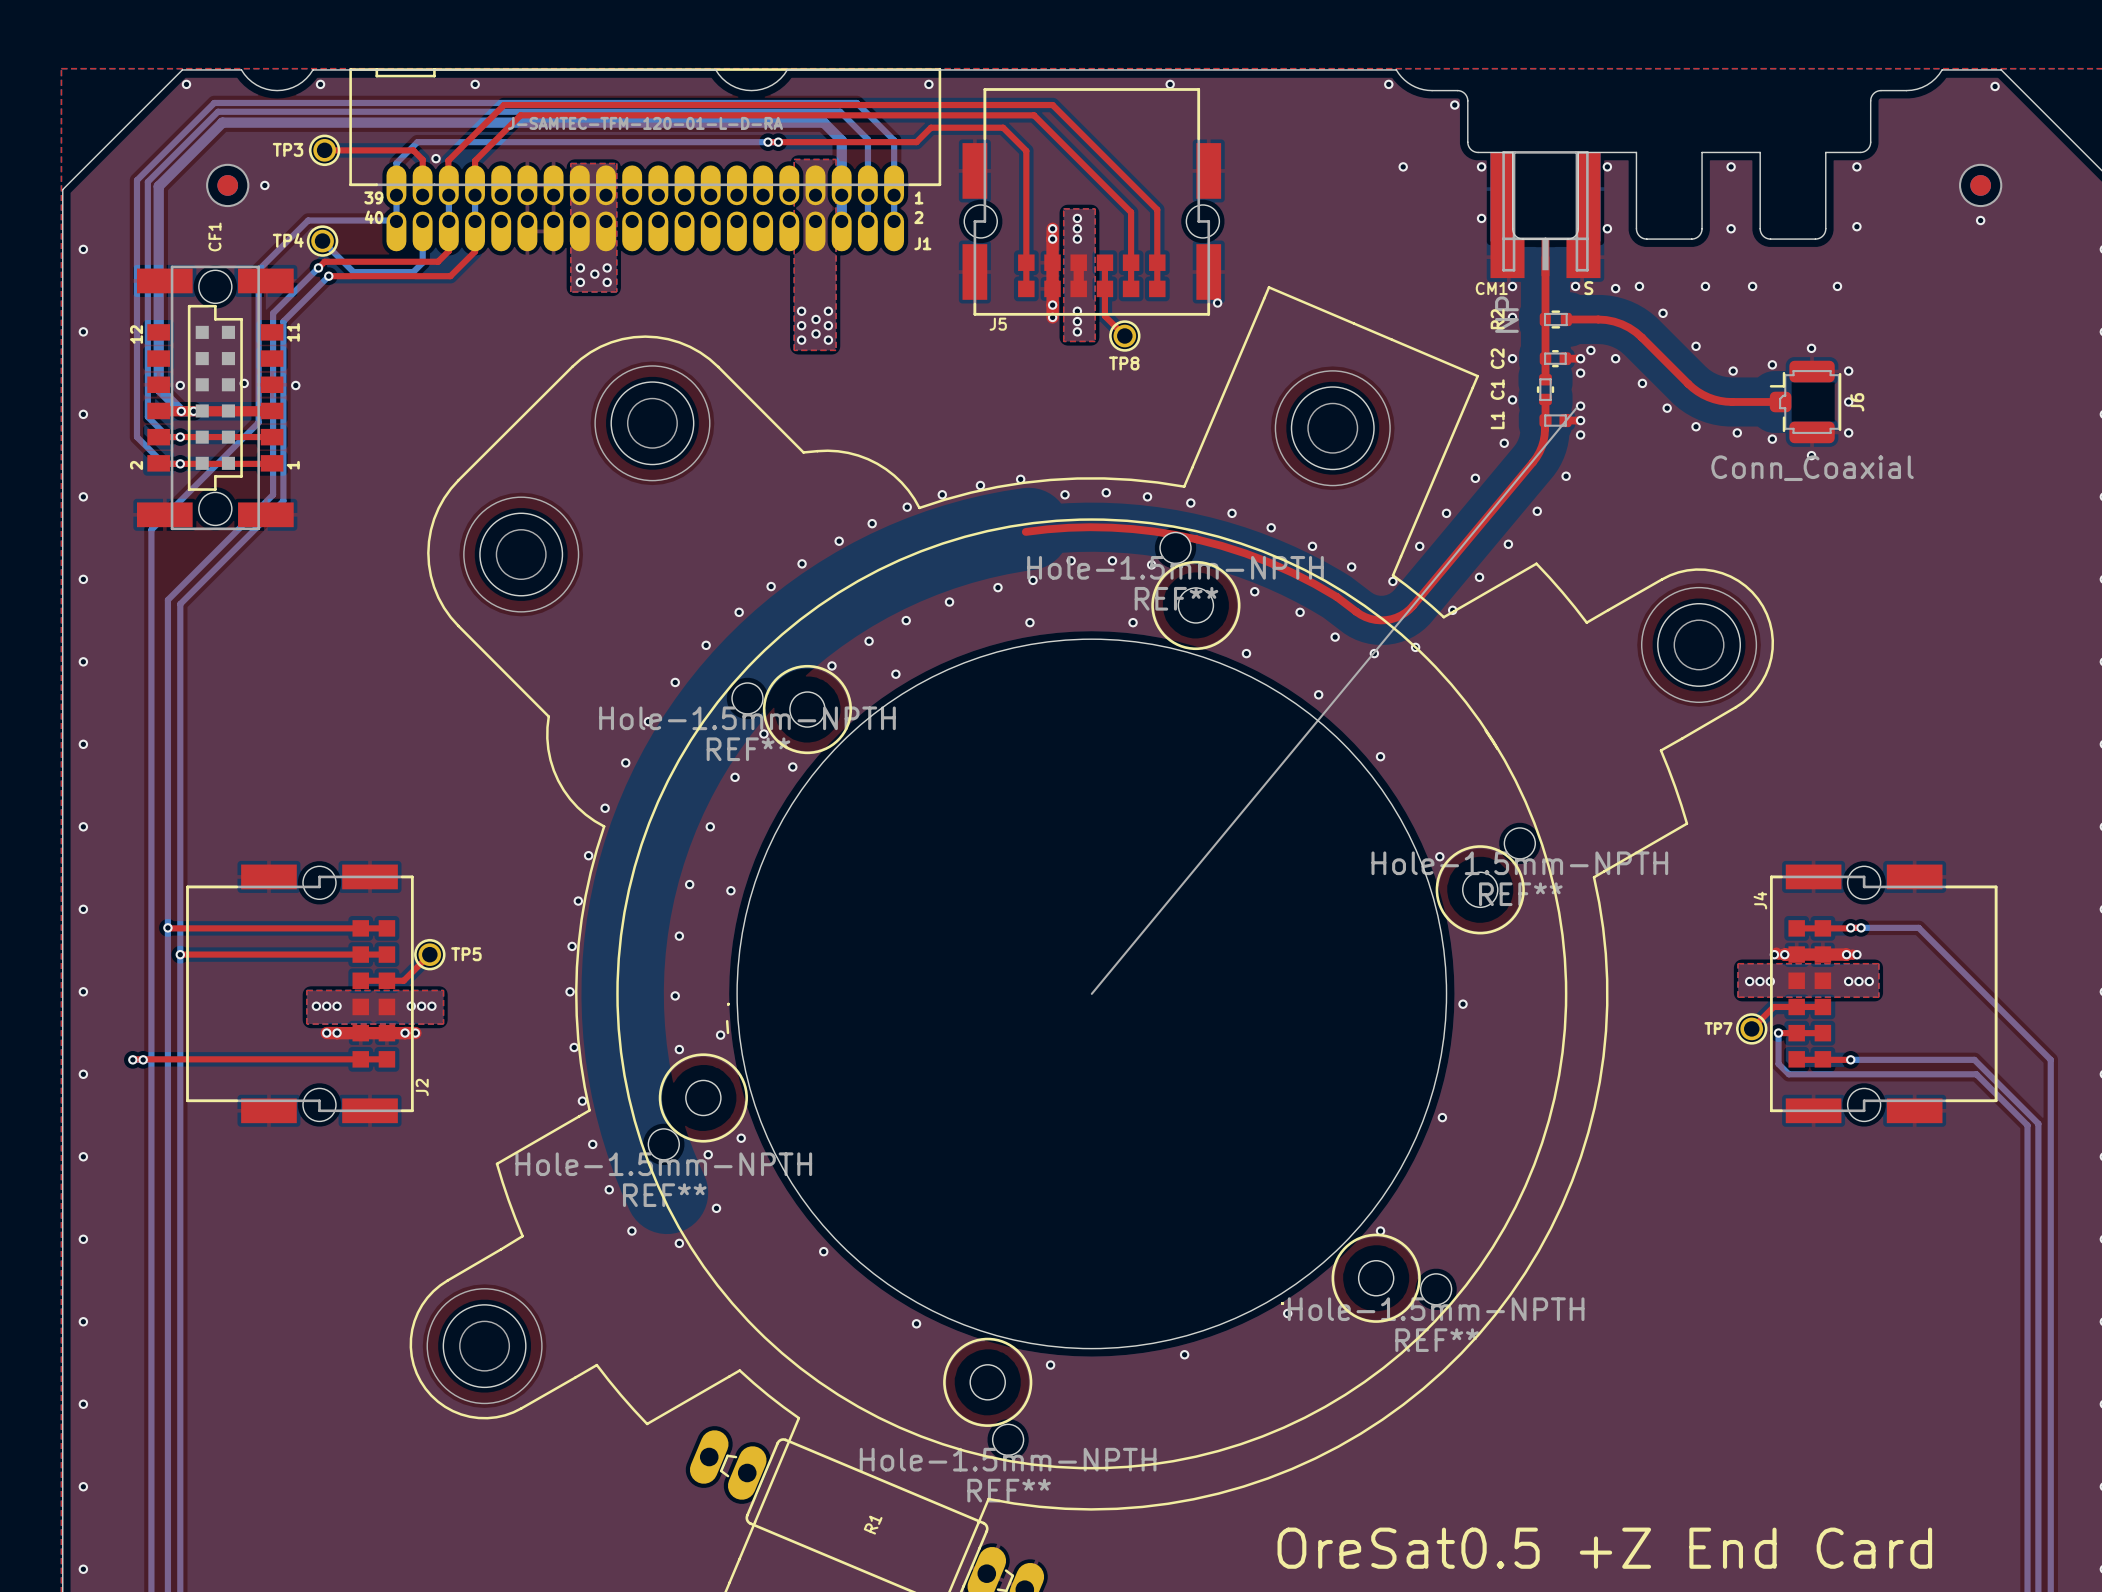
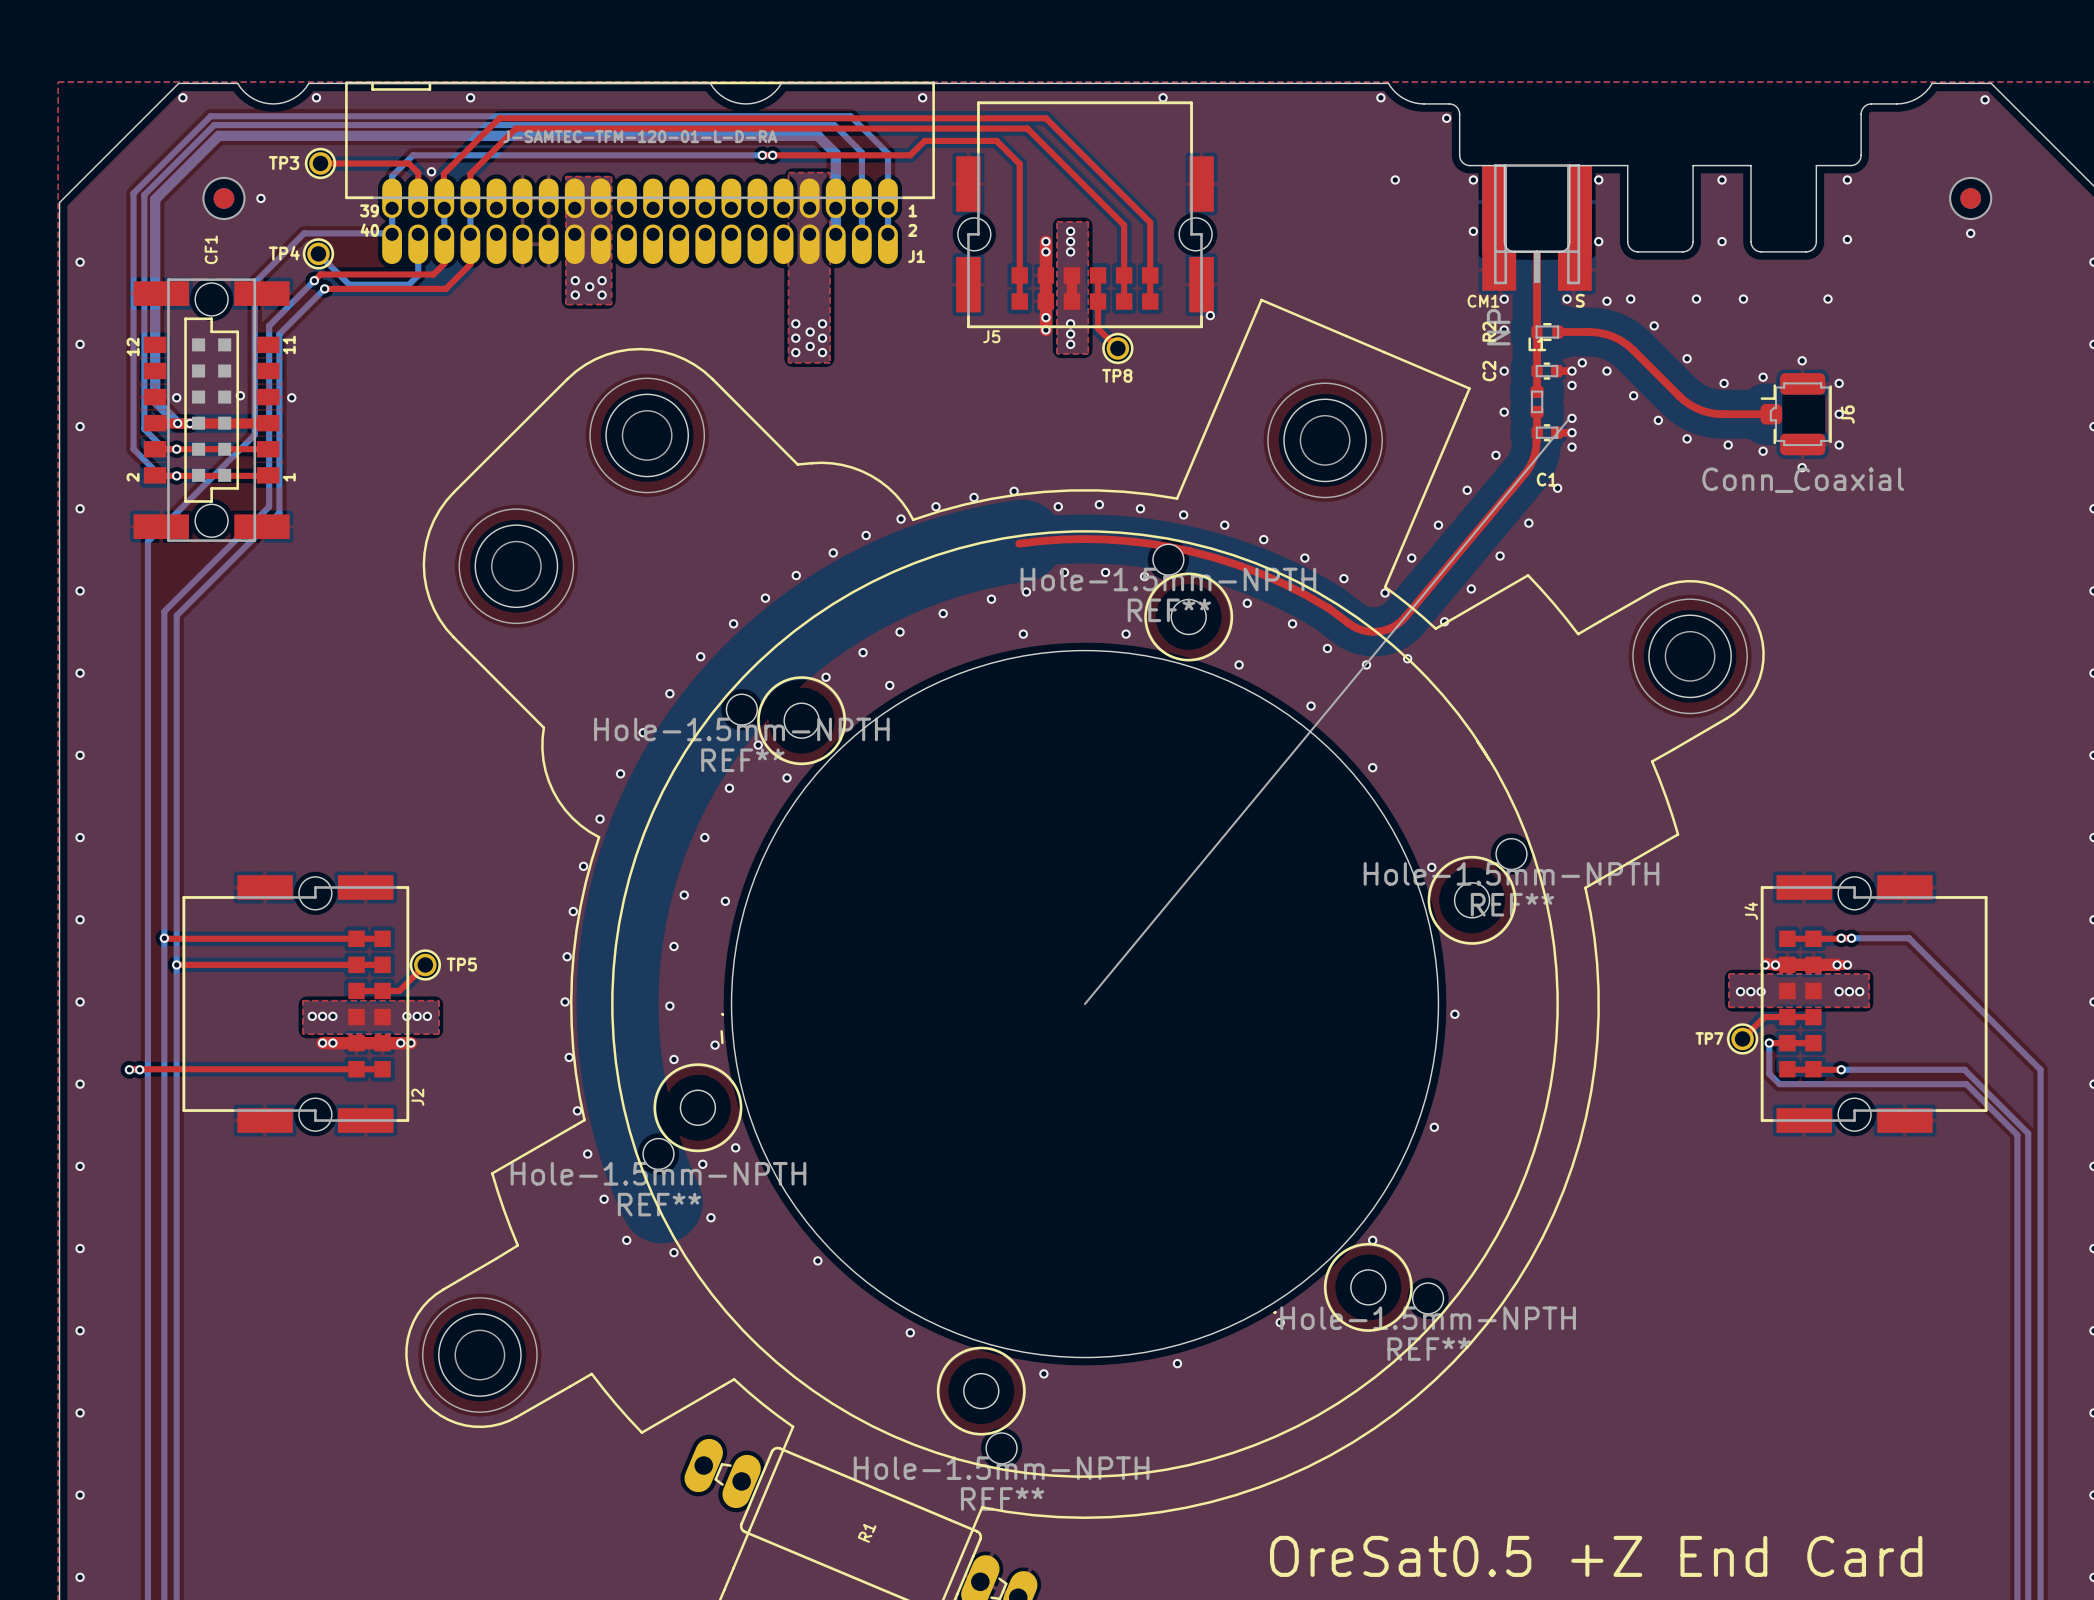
C1 name position: C1 (1497, 389) -> C1 (1547, 479)
C1 rotation: 0° (1545, 389) -> 90° clockwise (1547, 432)
C1 position: (1545, 389) -> (1547, 432)
L1 rotation: 0° (1555, 420) -> 90° clockwise (1537, 401)
L1 position: (1555, 420) -> (1537, 401)

